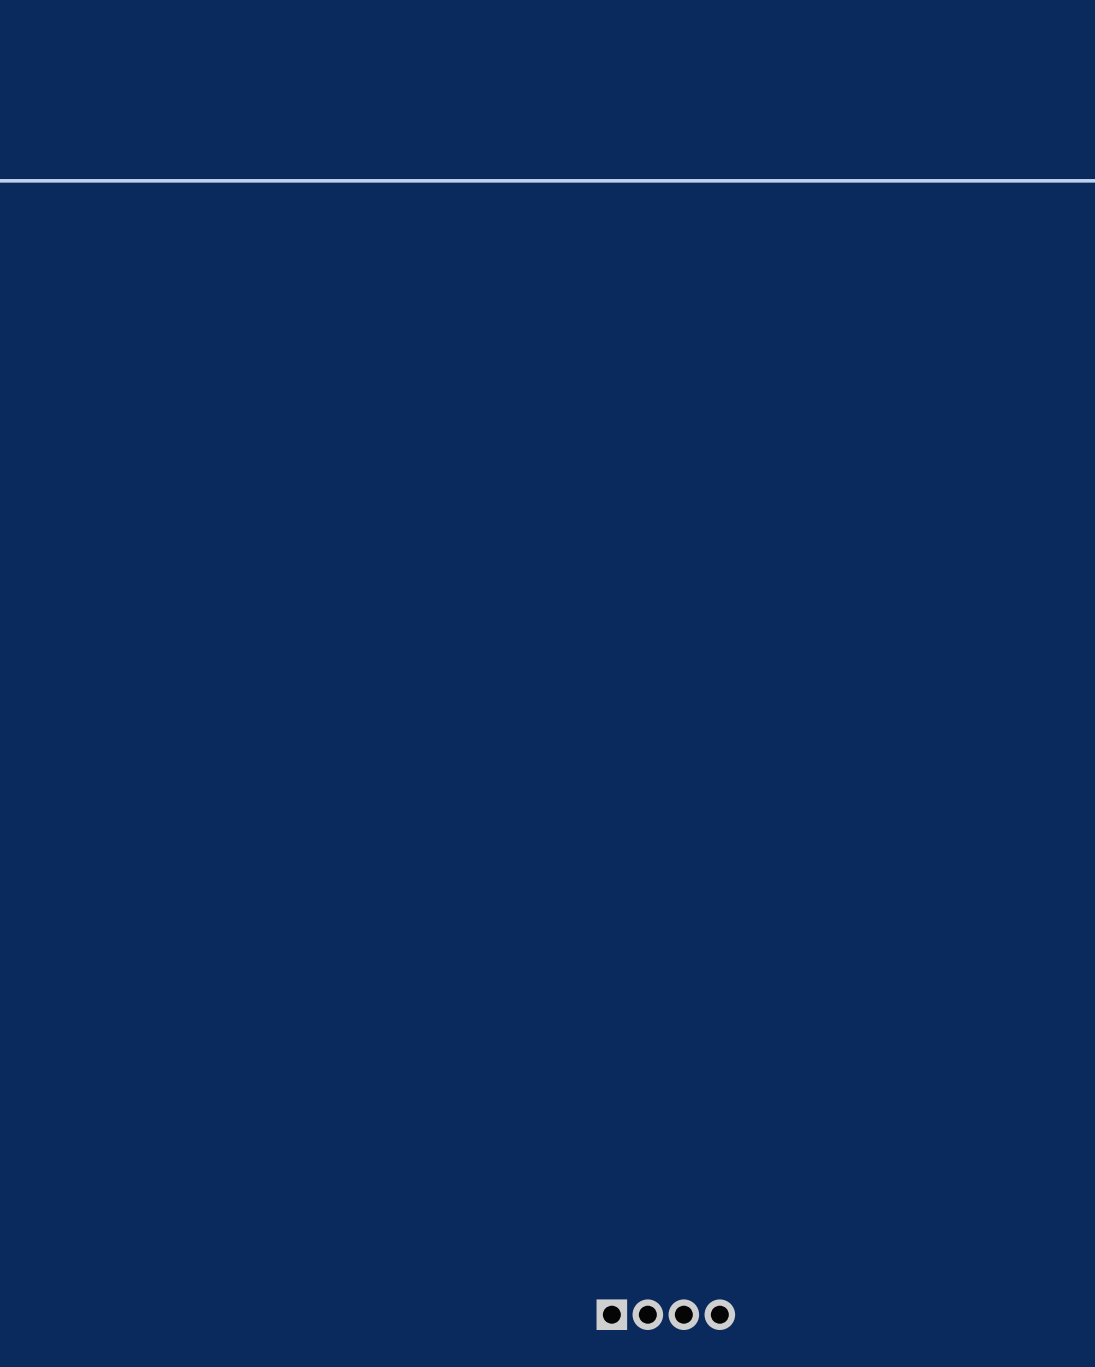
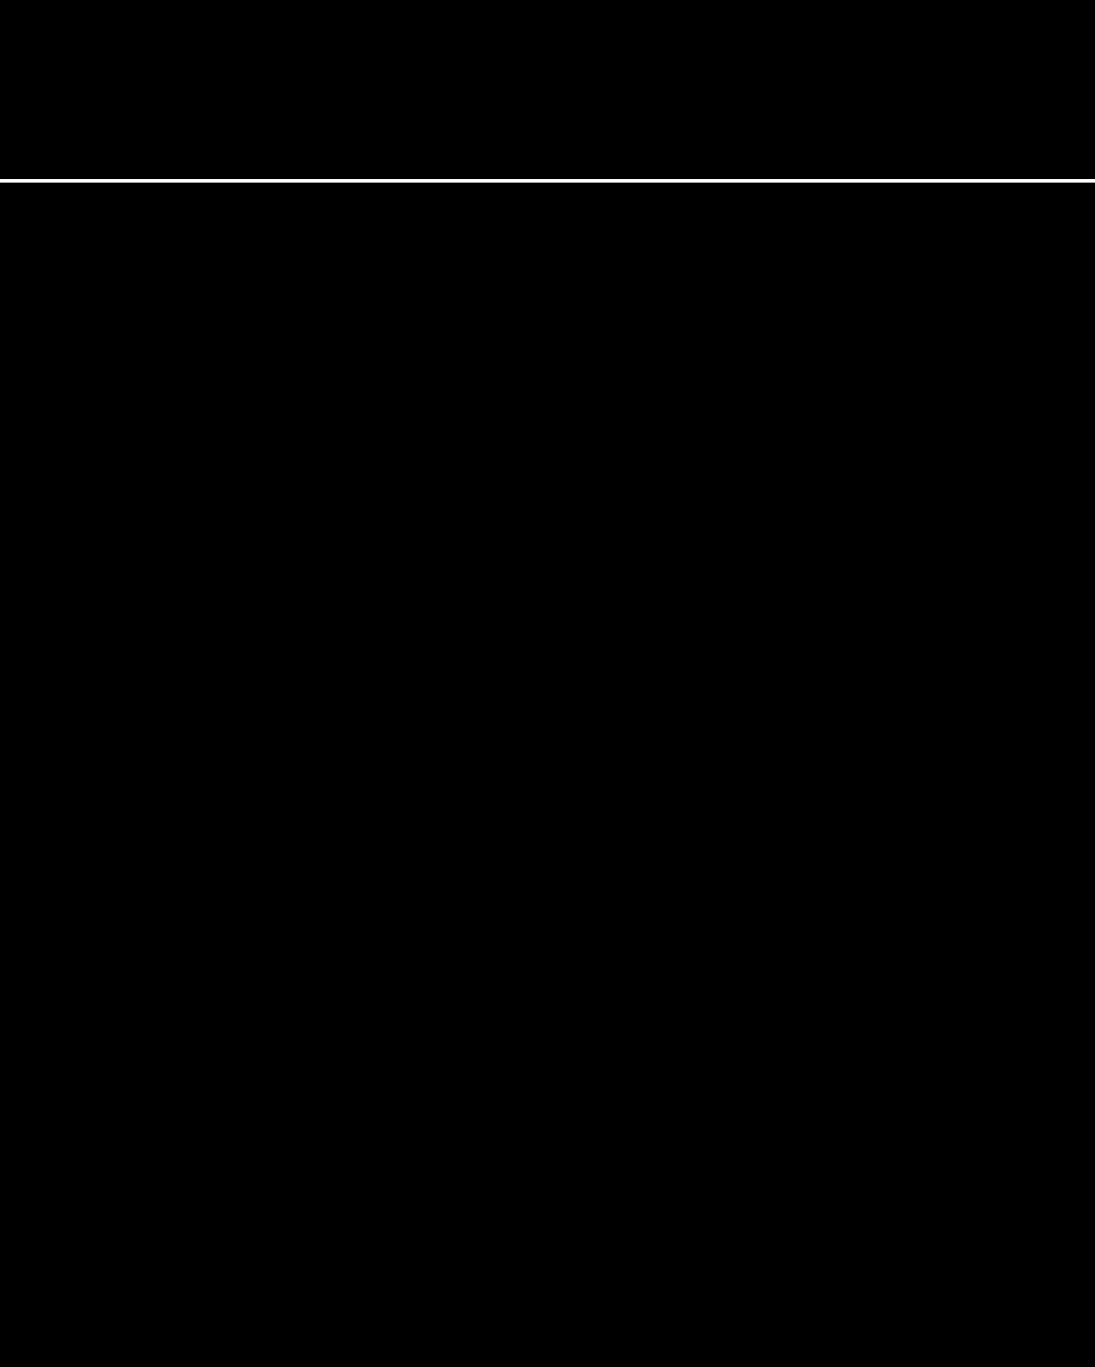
part: (665, 1314) -> none

